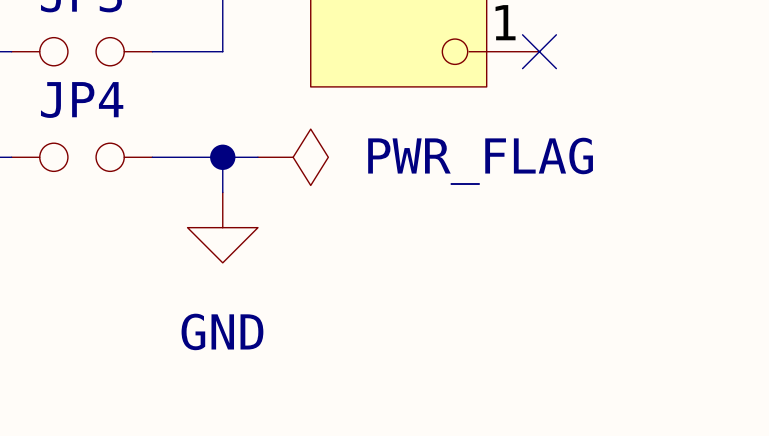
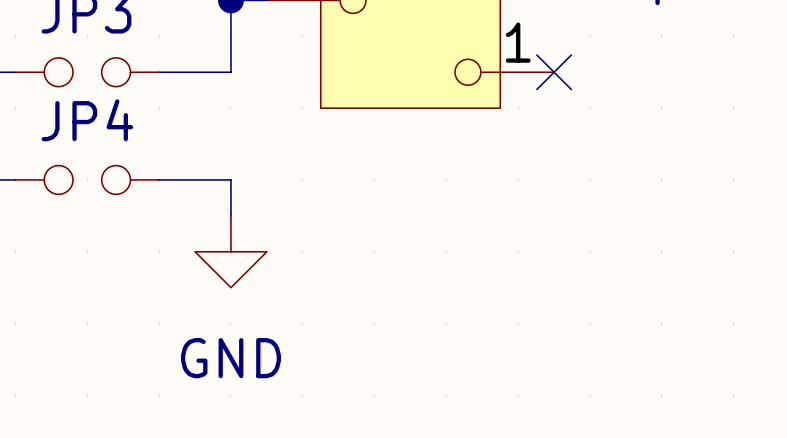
wire: (222, 157) (257, 157) -> none
junction: (222, 157) -> none
power symbol: PWR_FLAG (293, 157) -> none

